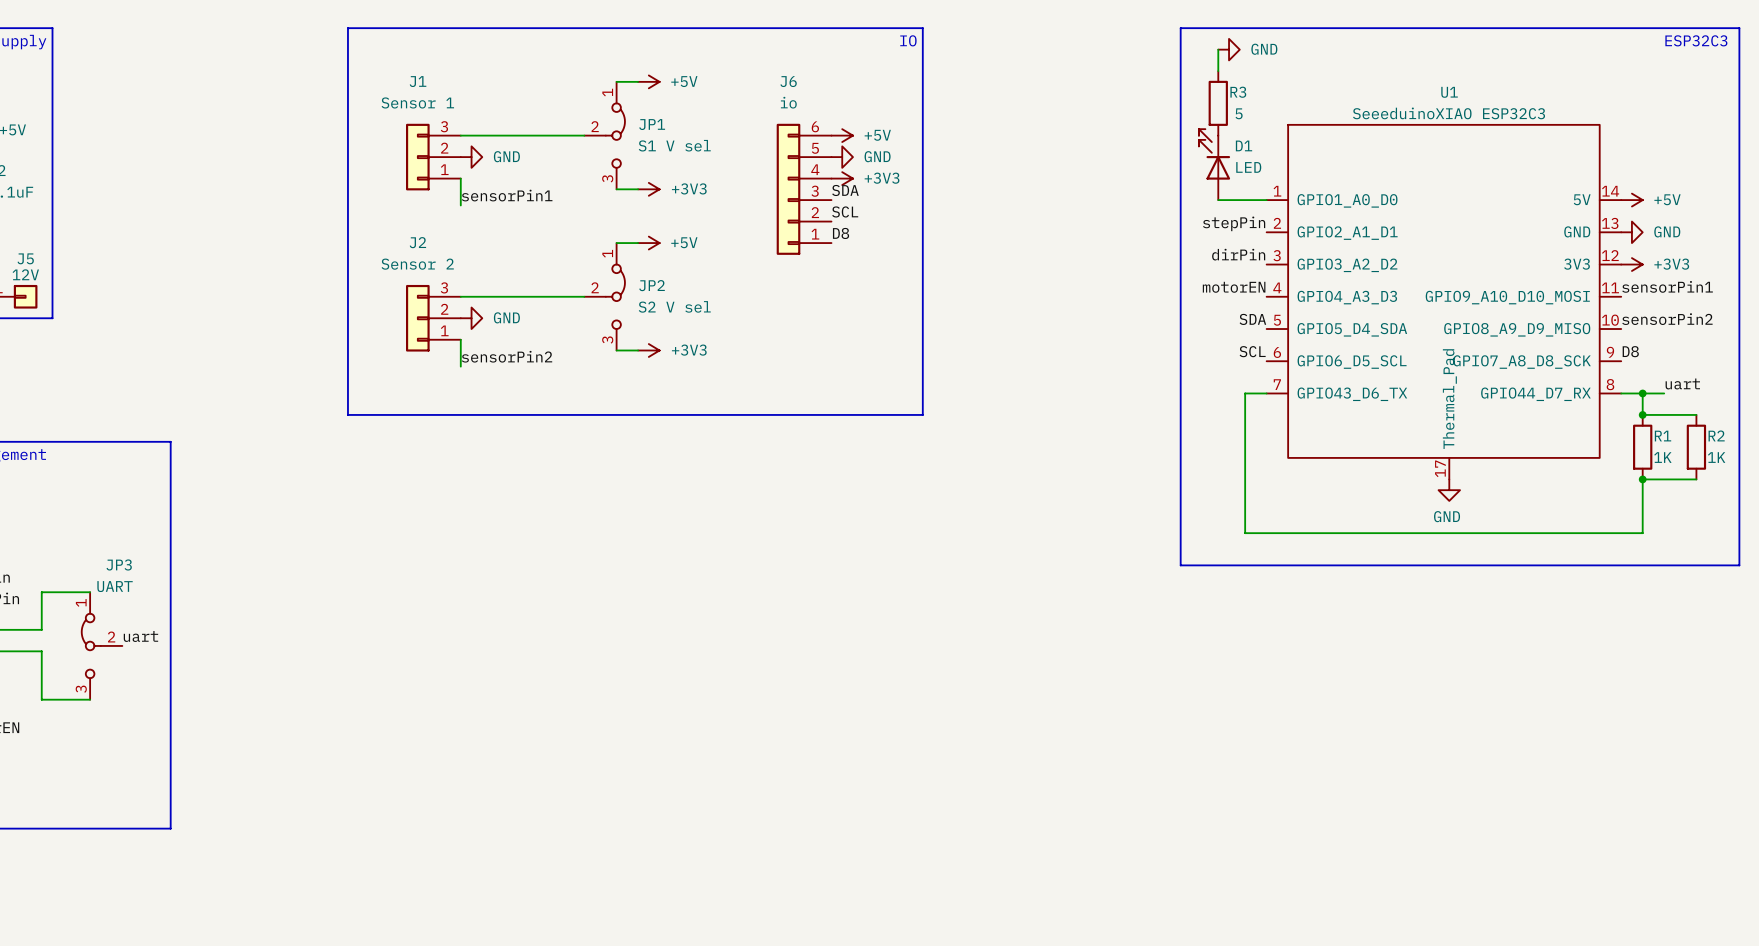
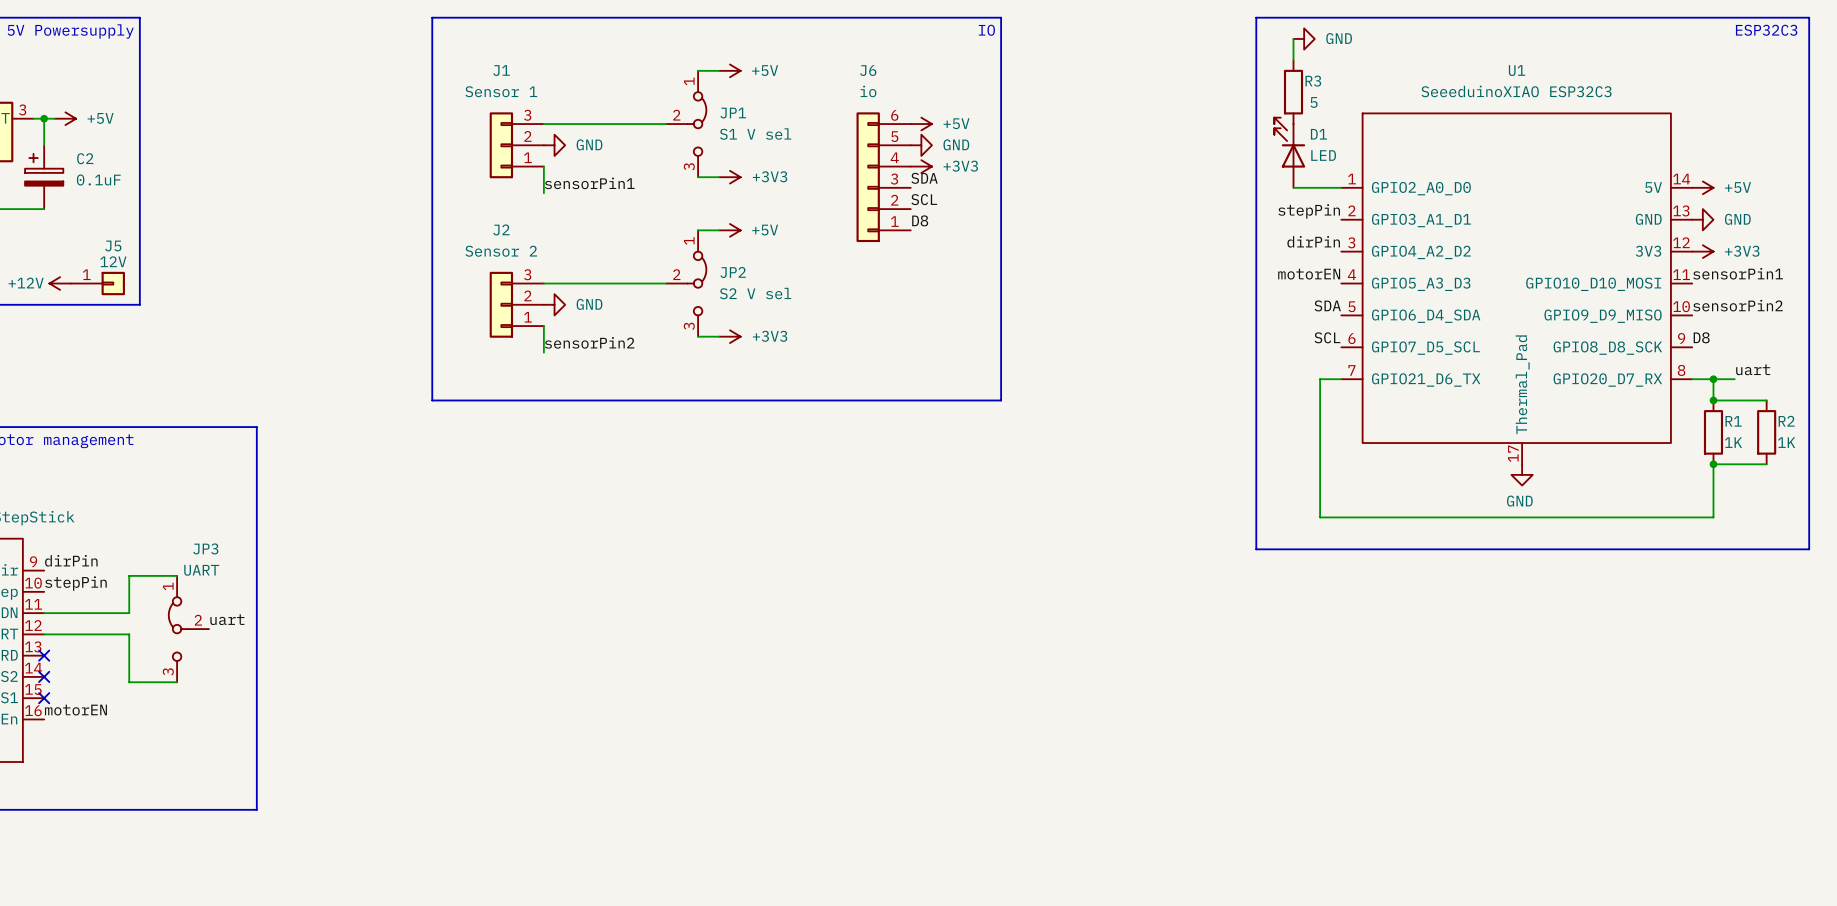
U1 symbol: [1266, 124, 1622, 480] -> [1341, 113, 1693, 465]

